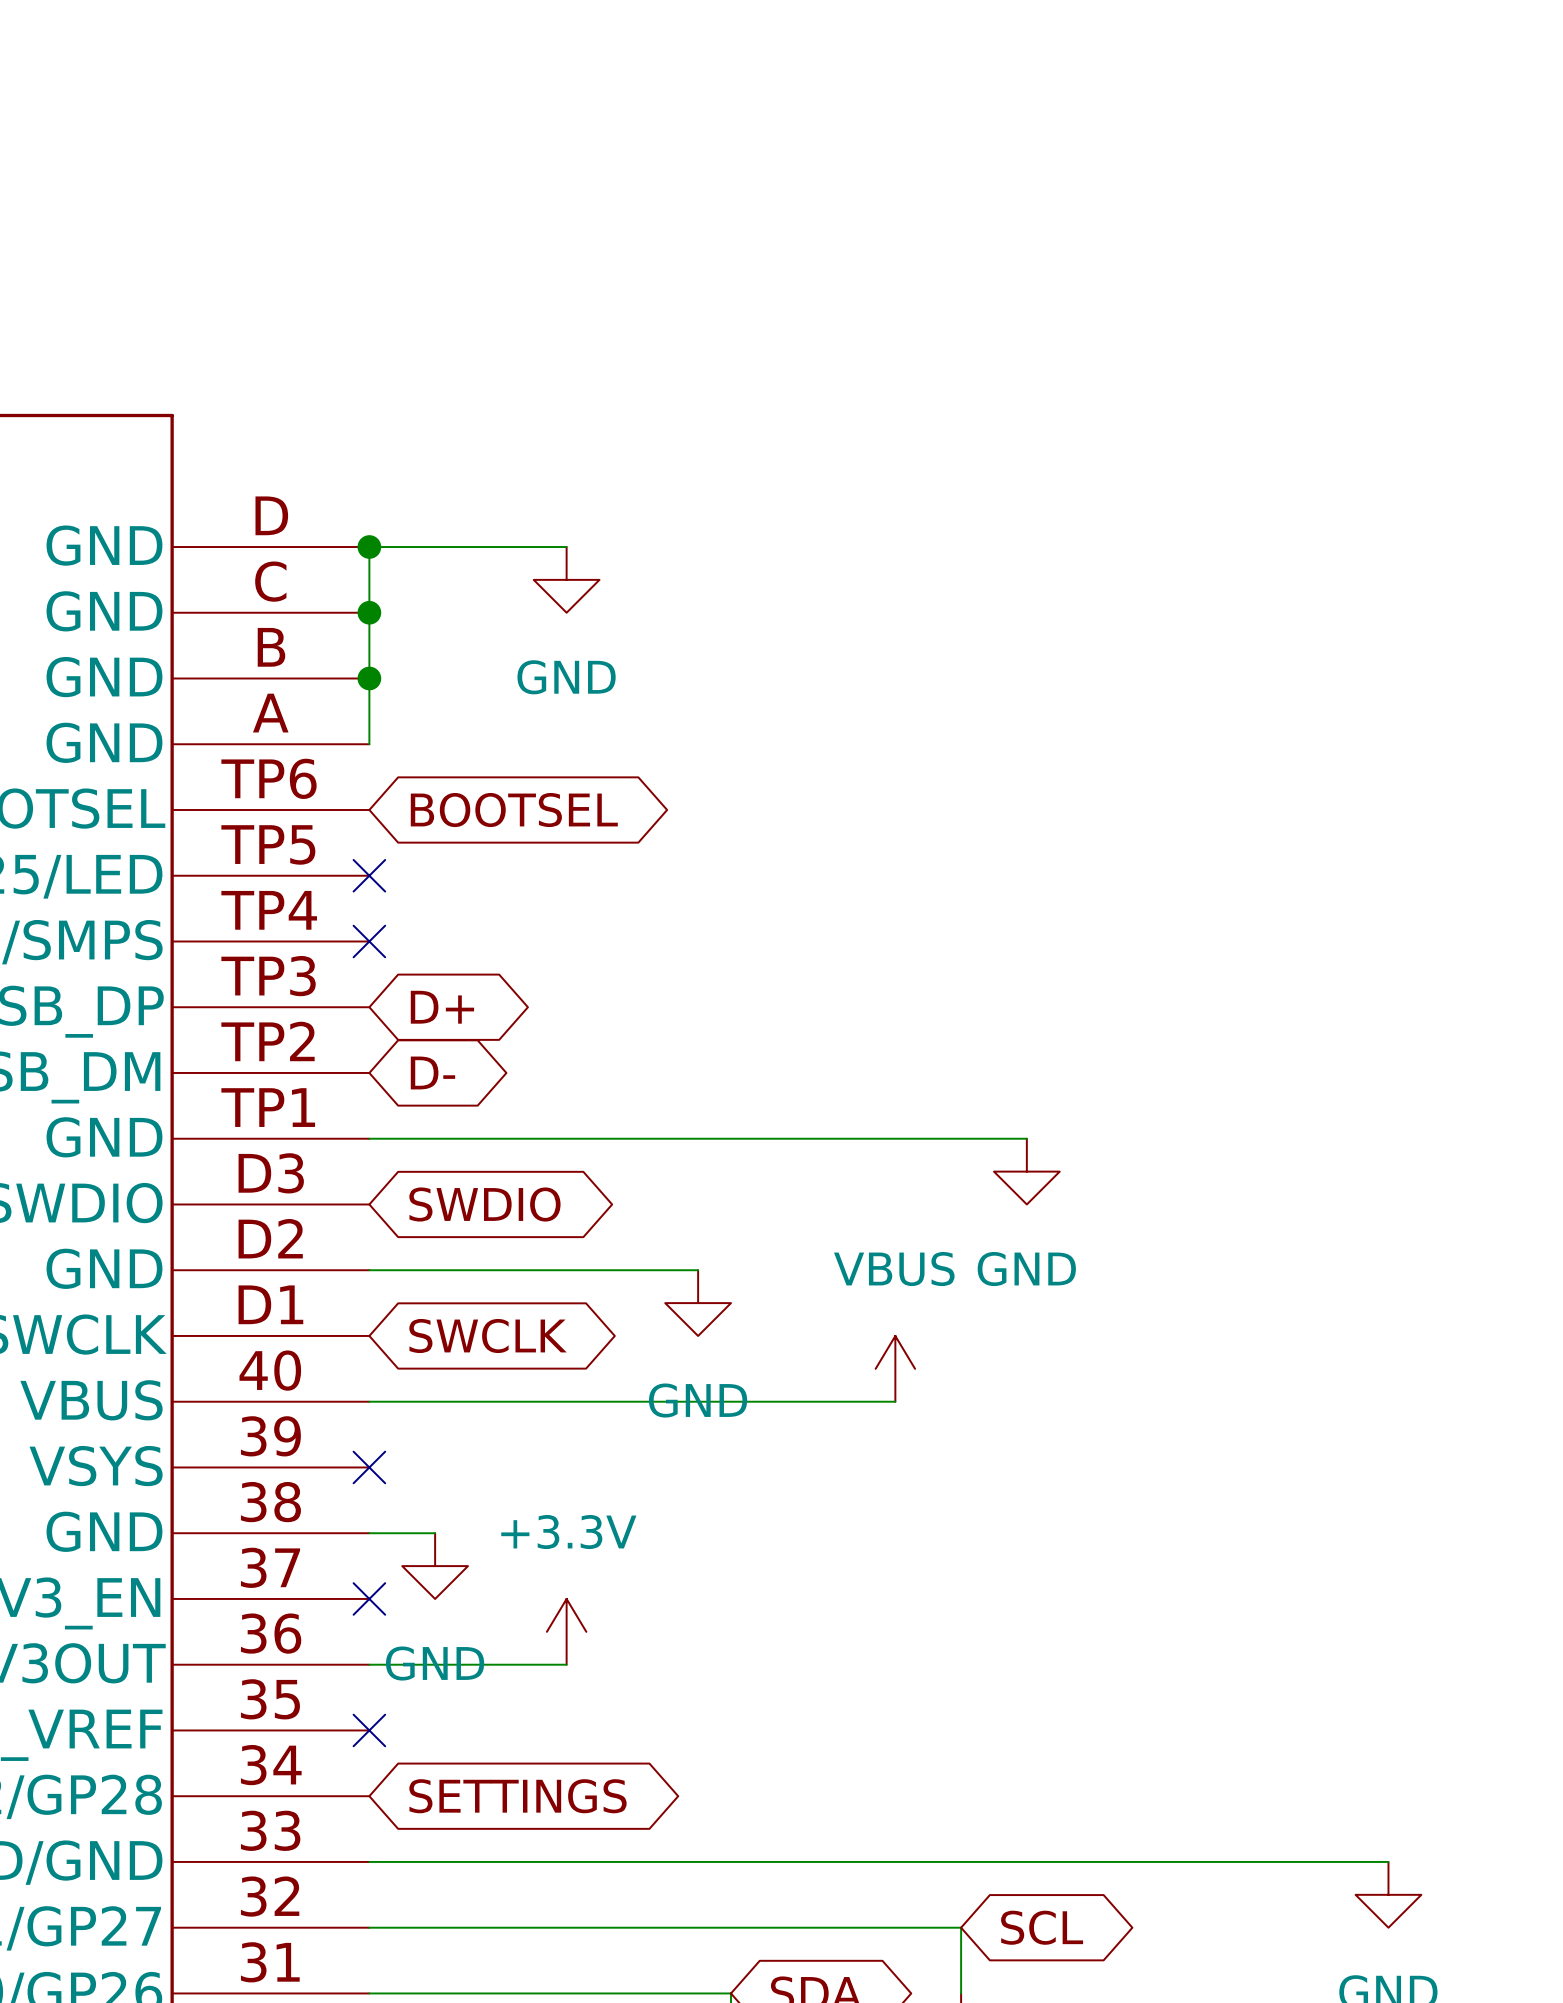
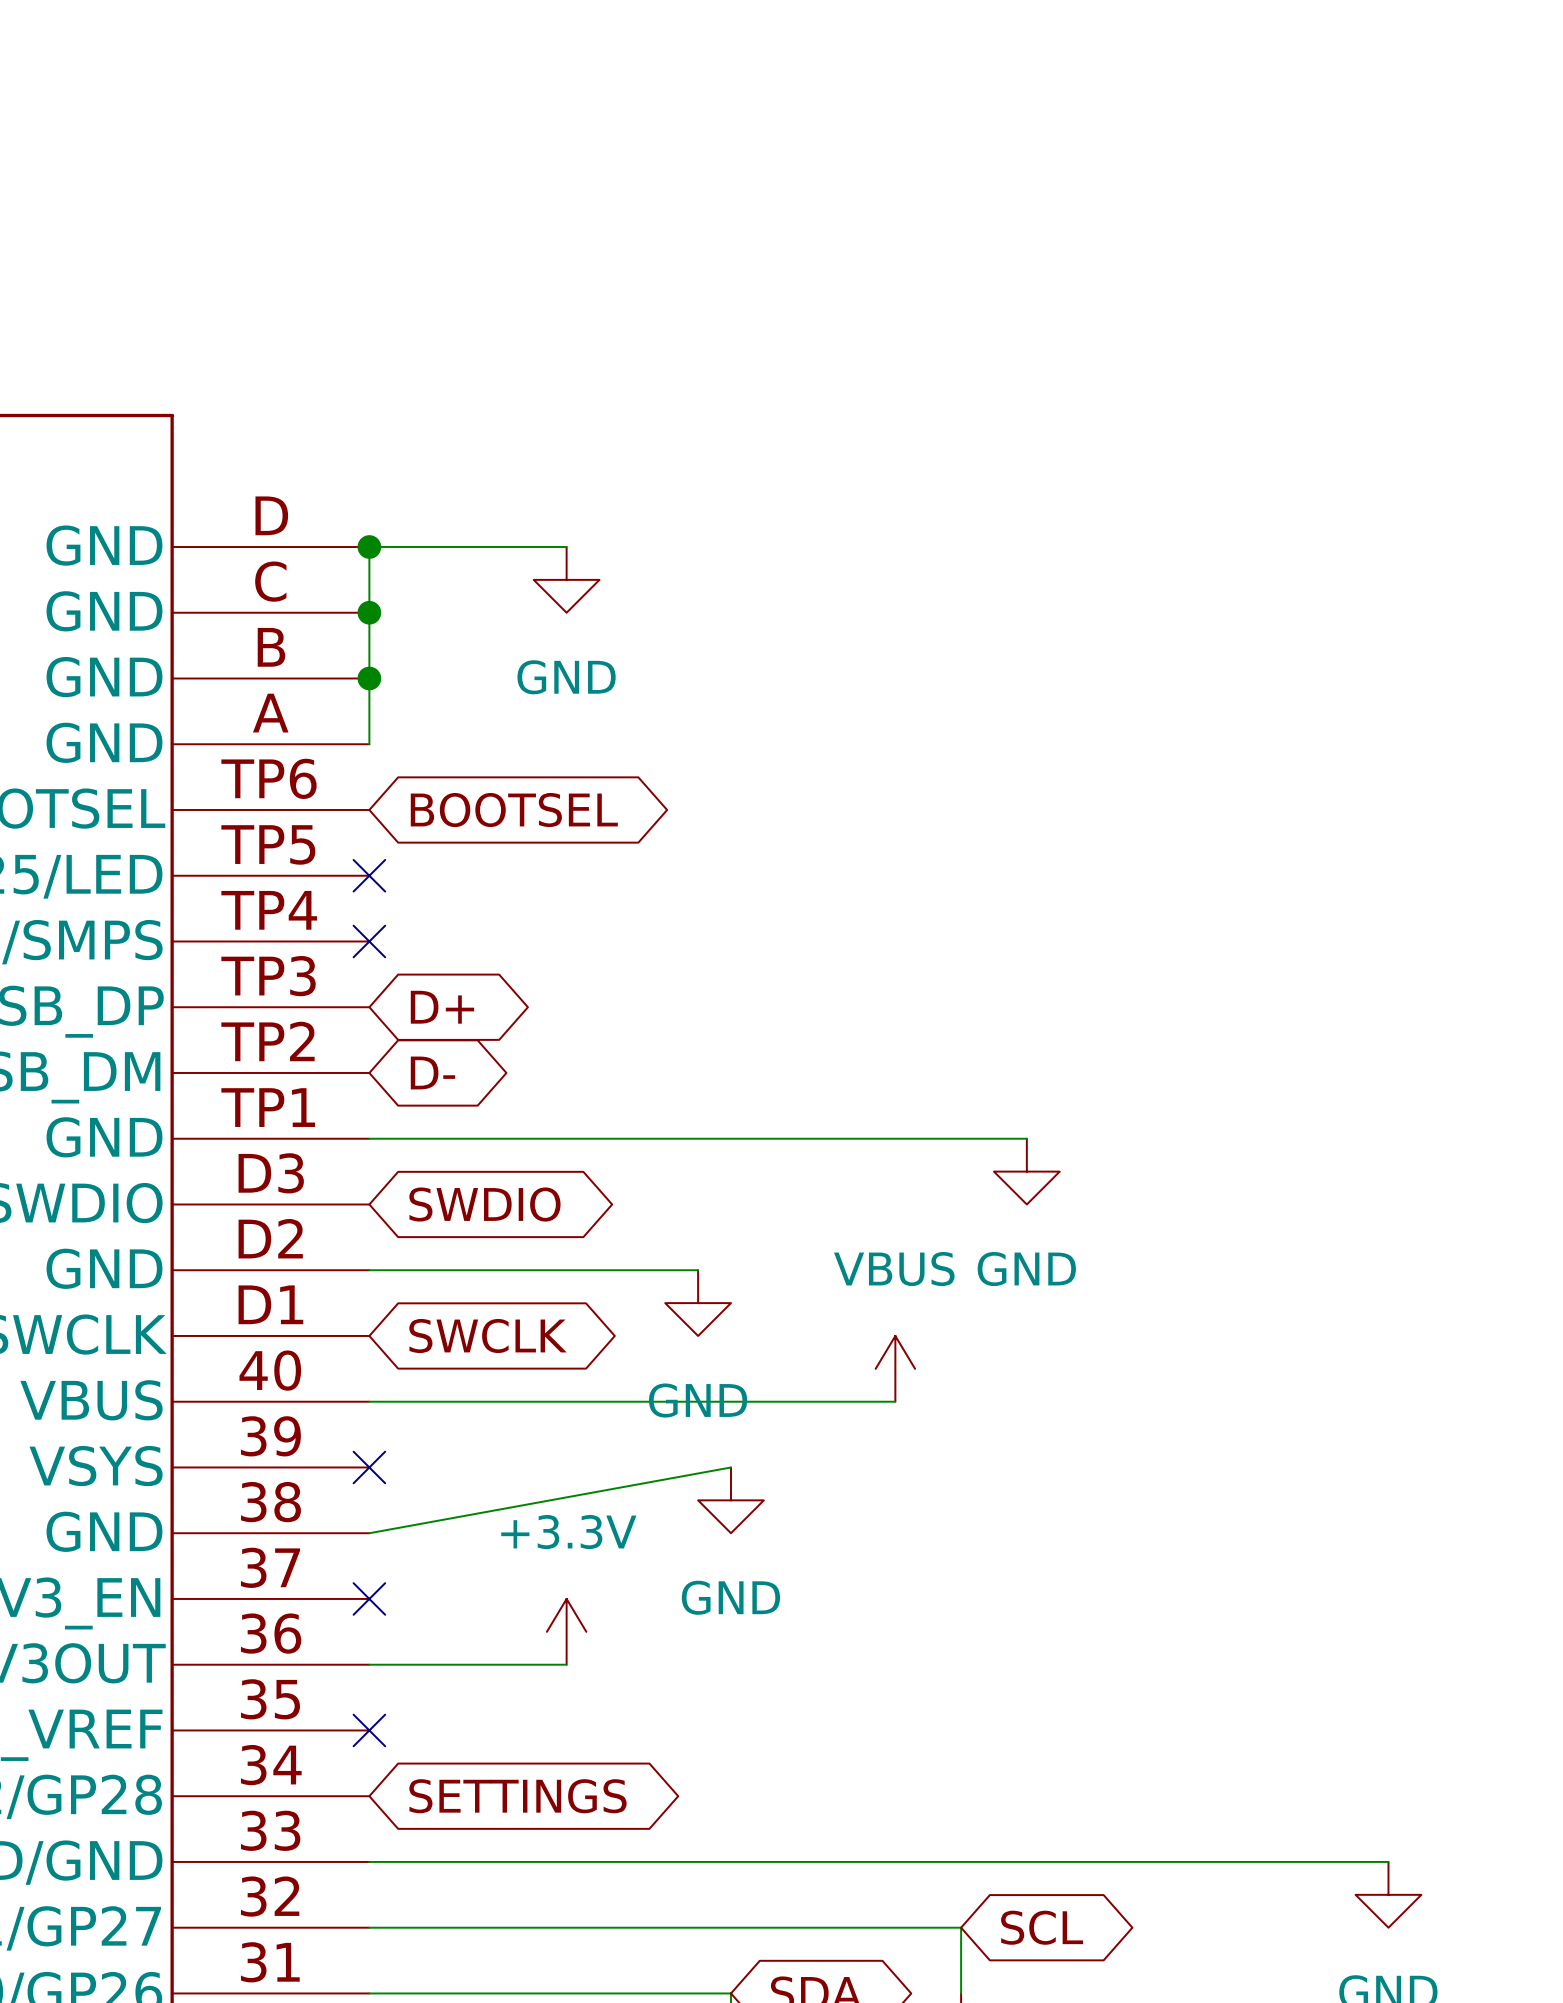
wire: (369, 1533) (435, 1533) -> (369, 1533) (730, 1467)
power symbol position: GND (435, 1566) -> GND (730, 1500)

